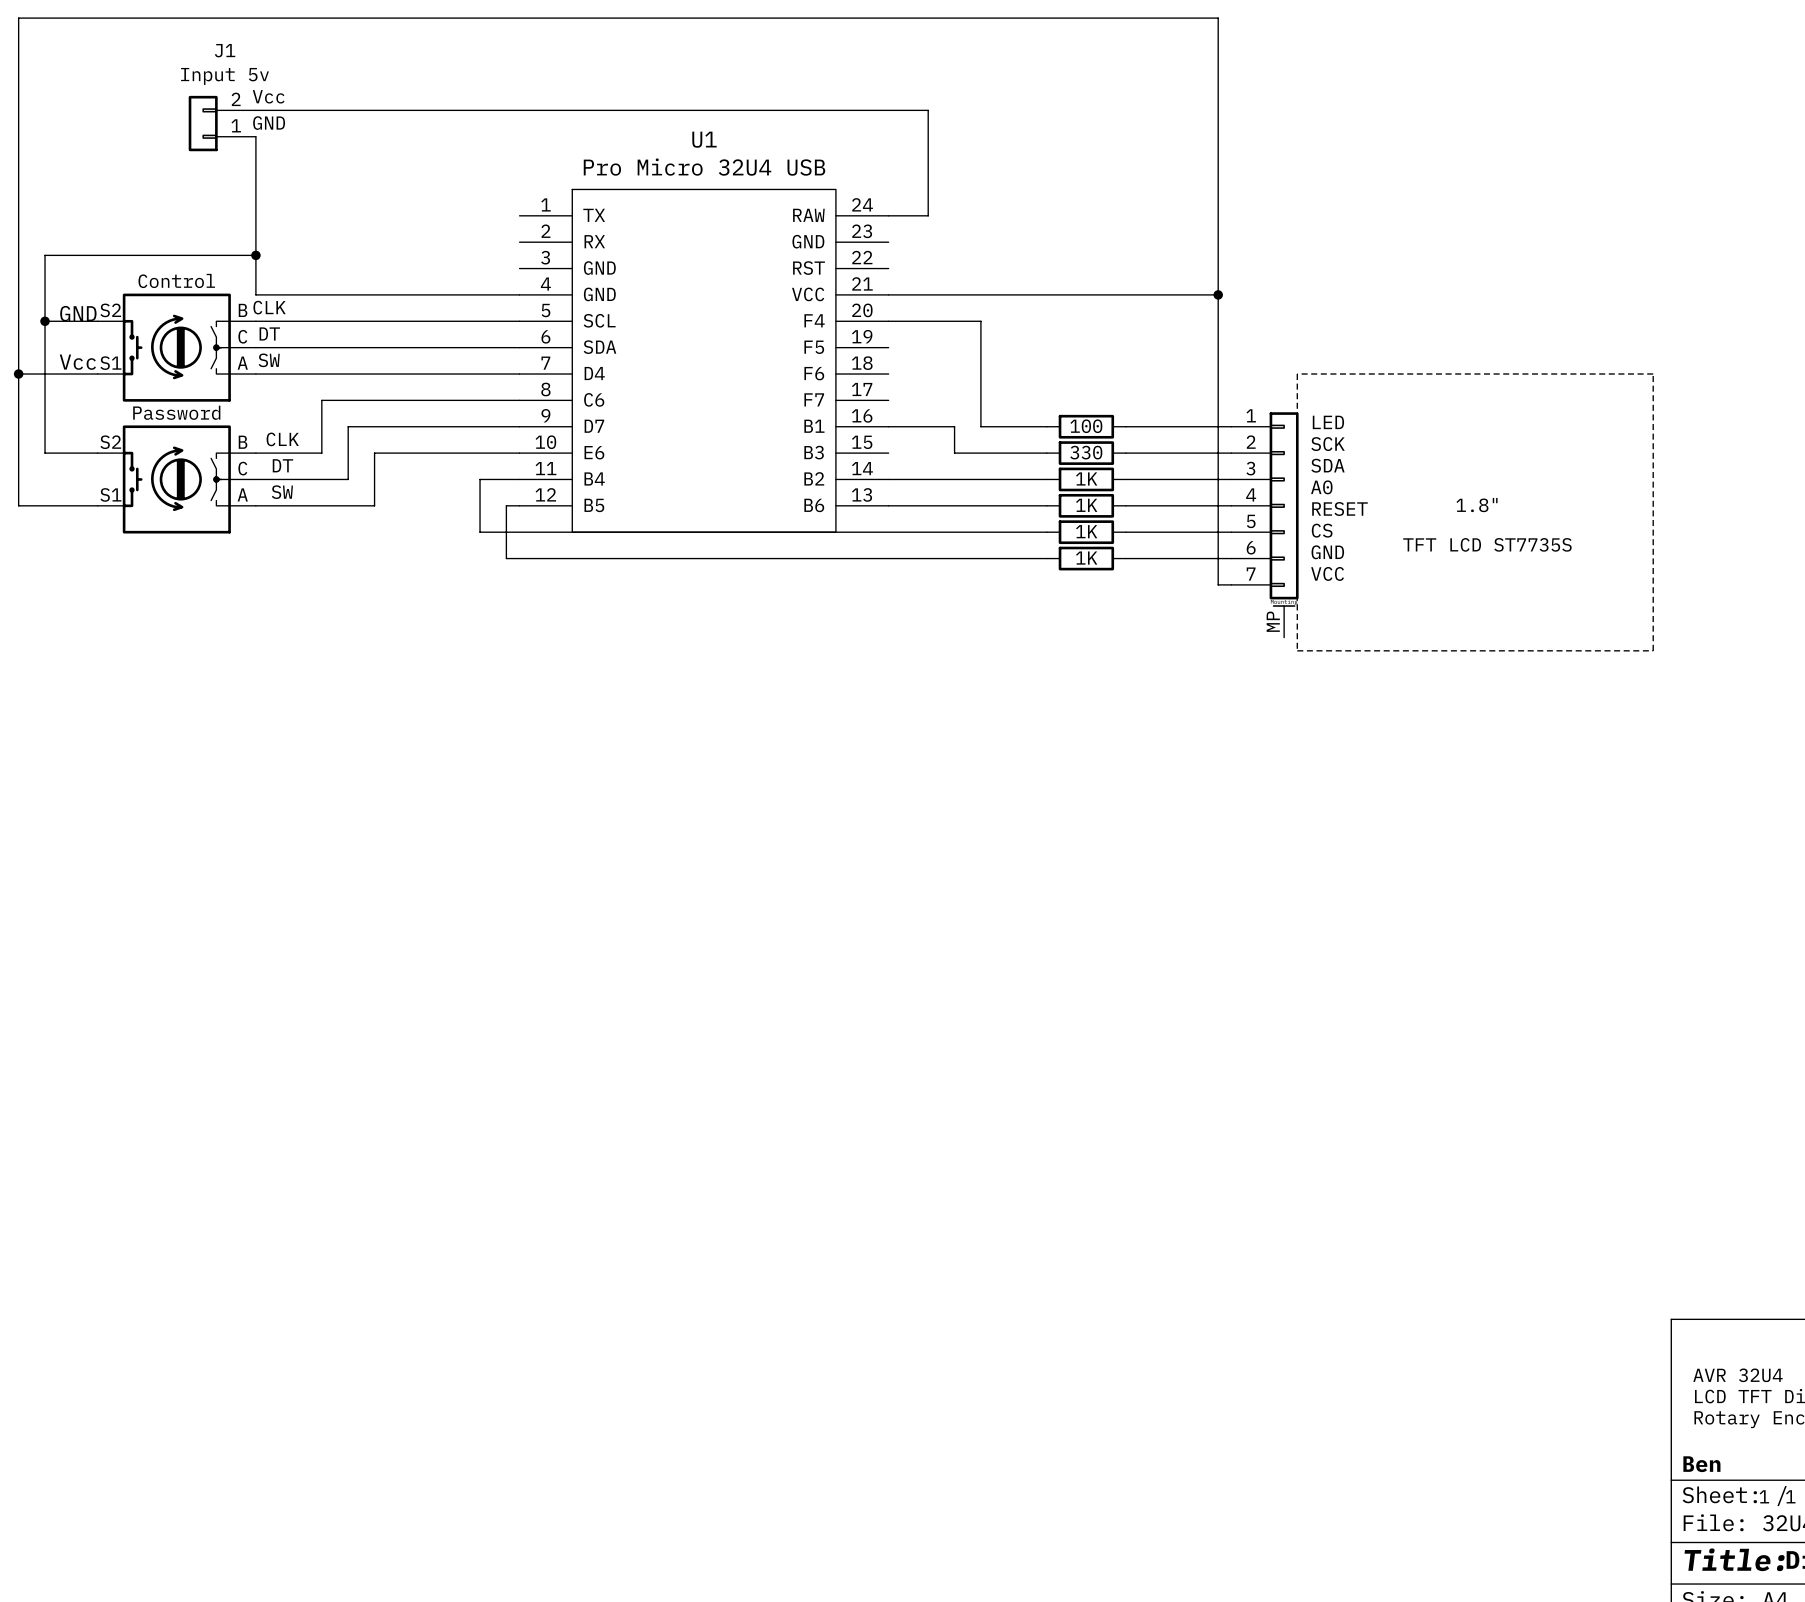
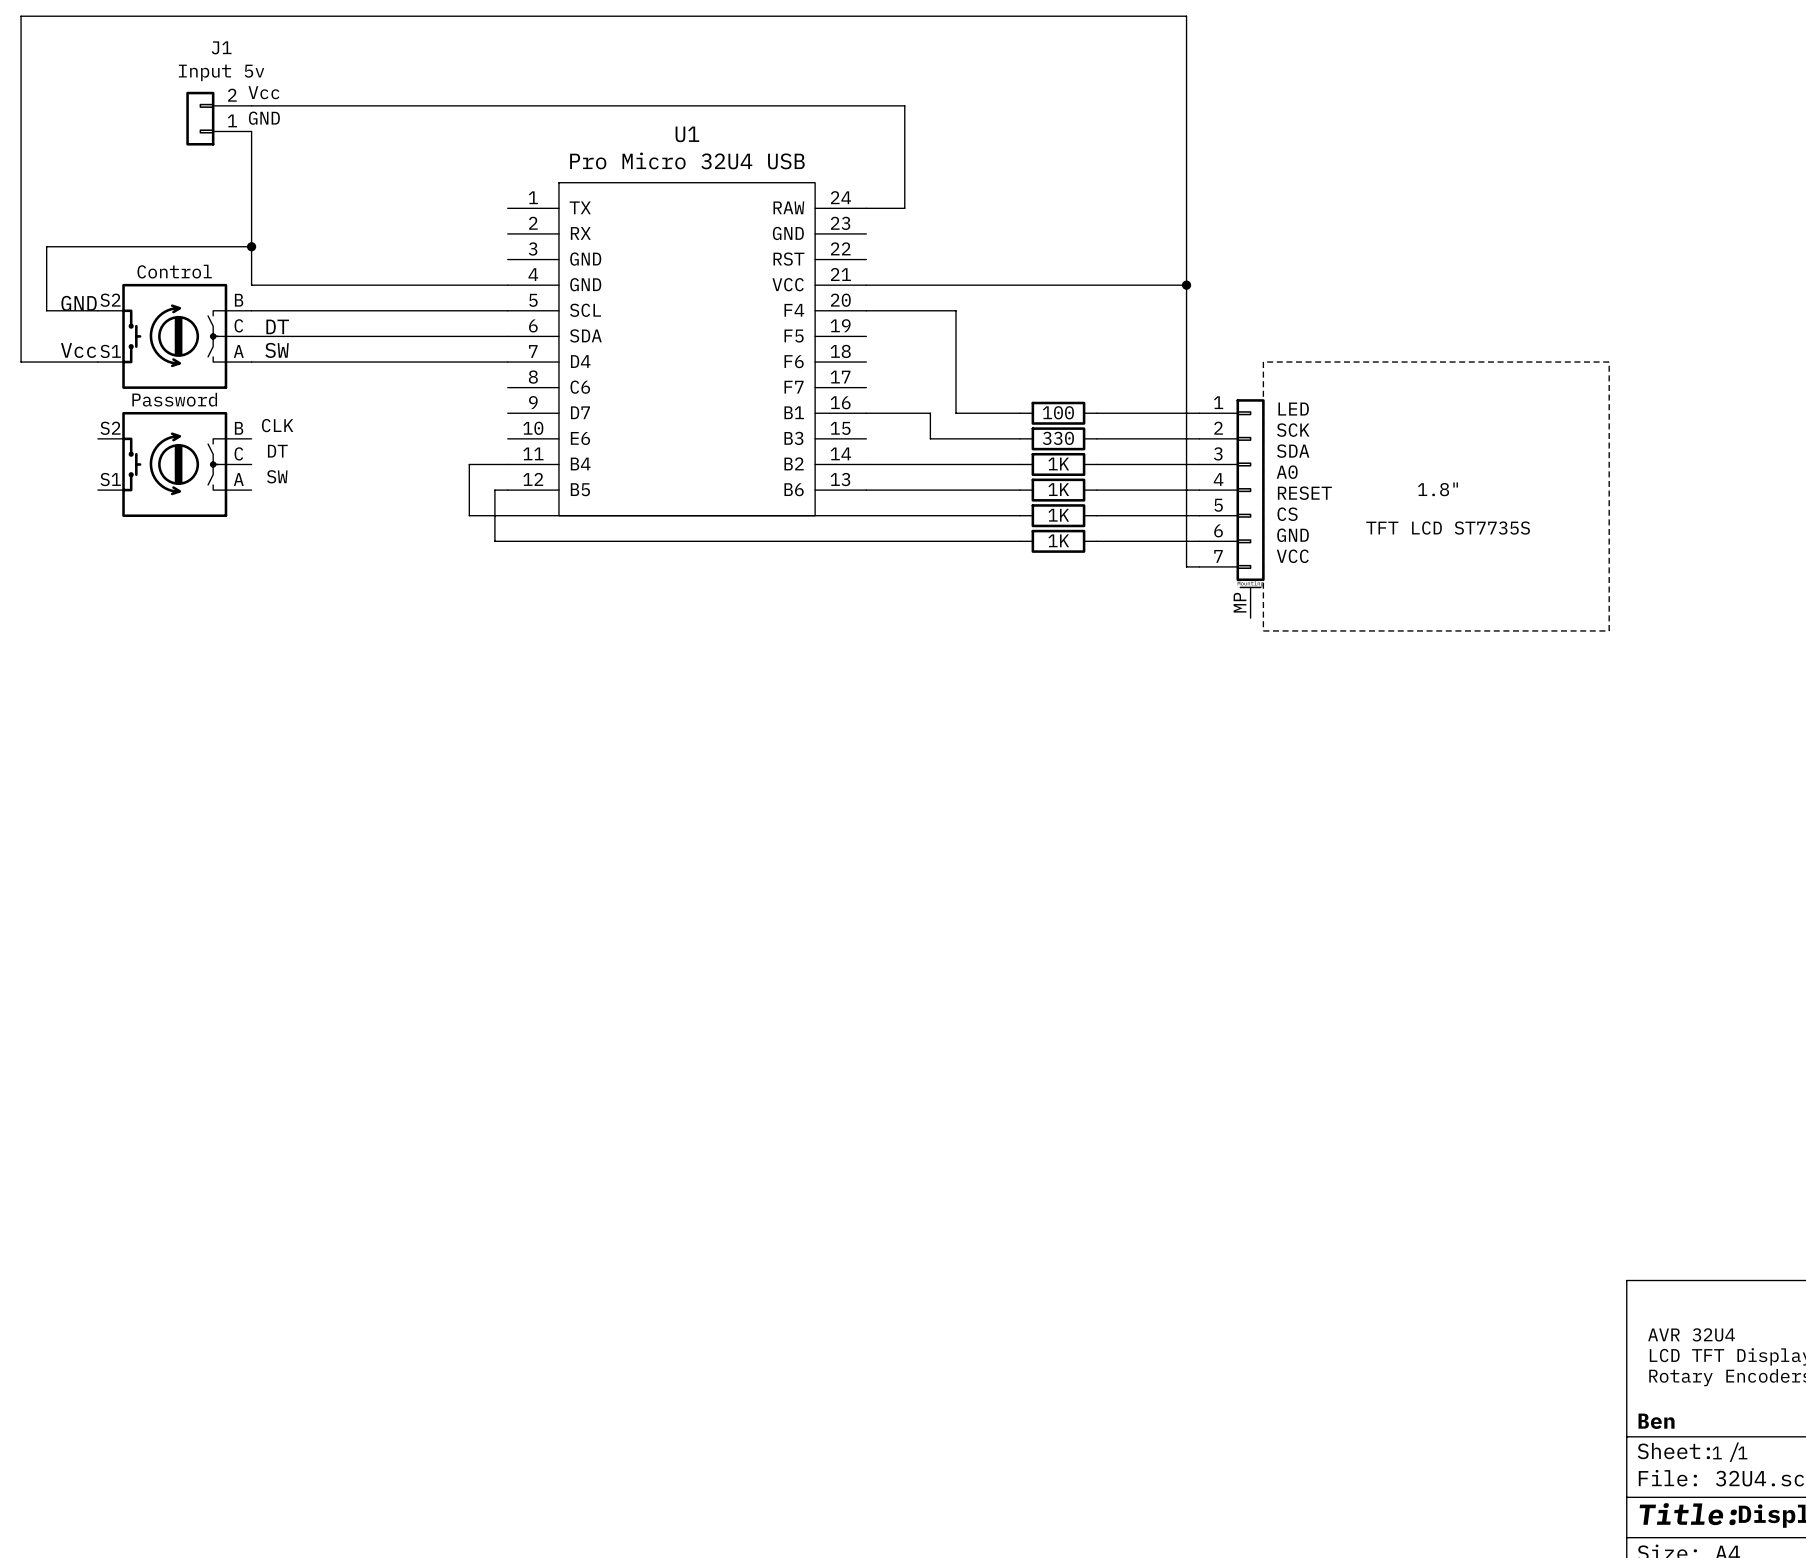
Control text: CLK (269, 307) -> none
wire: (45, 321) (45, 453) (97, 453) -> none
junction: (45, 321) -> none
Control text: DT (269, 333) -> none
text: none -> DT (277, 326)
Control text: SW (269, 360) -> none
text: none -> SW (277, 350)
wire: (18, 374) (18, 505) (97, 505) -> none
junction: (18, 374) -> none
wire: (519, 400) (321, 400) (321, 453) (255, 453) -> none
wire: (519, 426) (348, 426) (348, 479) (255, 479) -> none
wire: (519, 453) (374, 453) (374, 505) (255, 505) -> none

